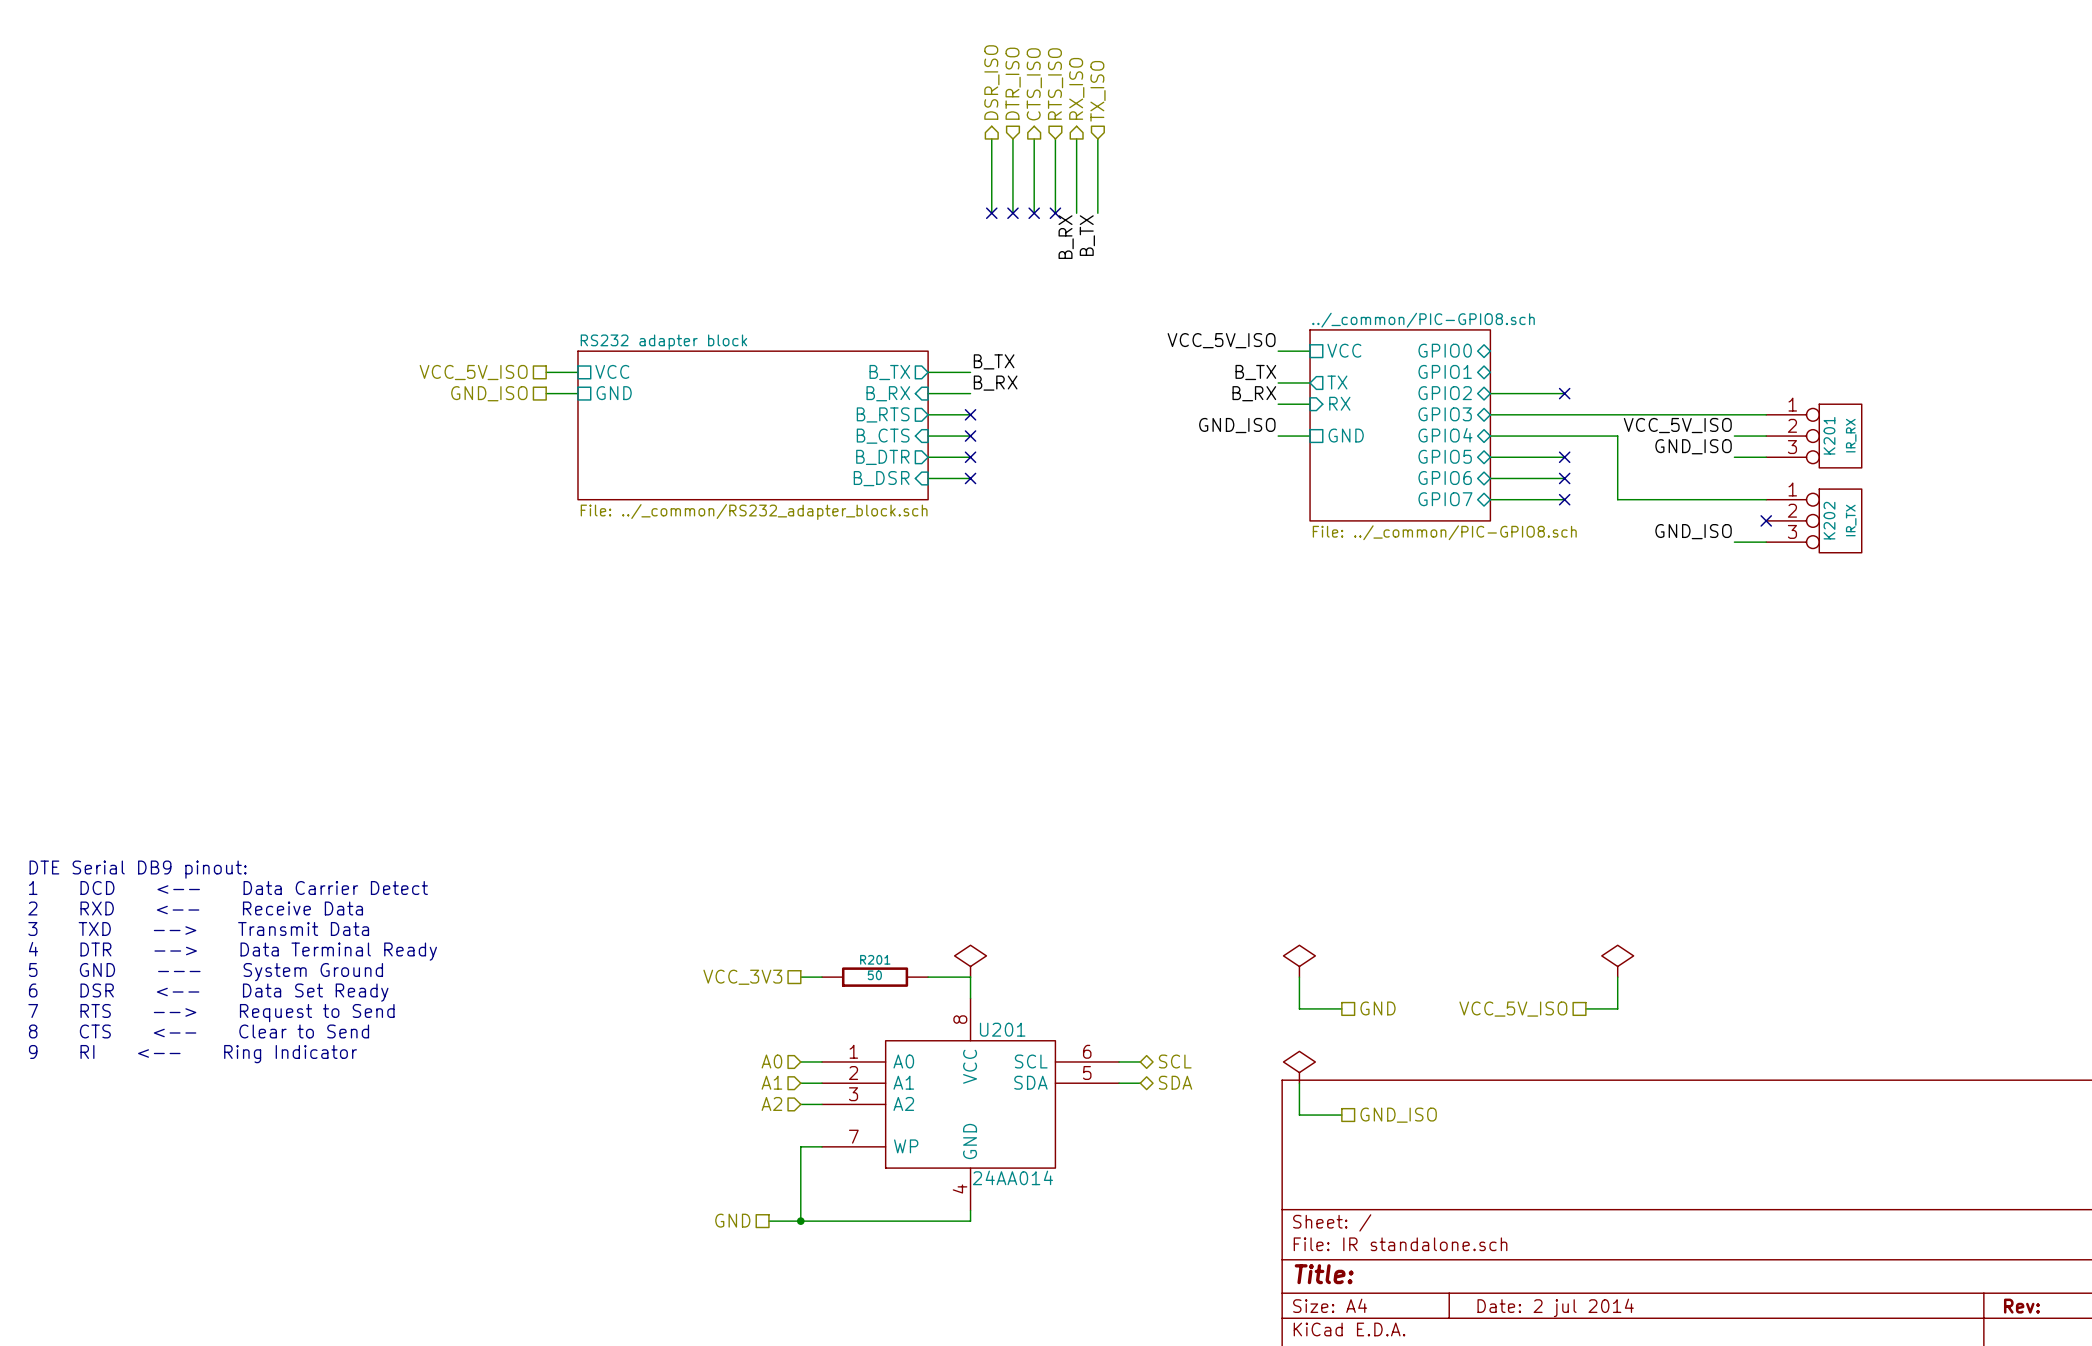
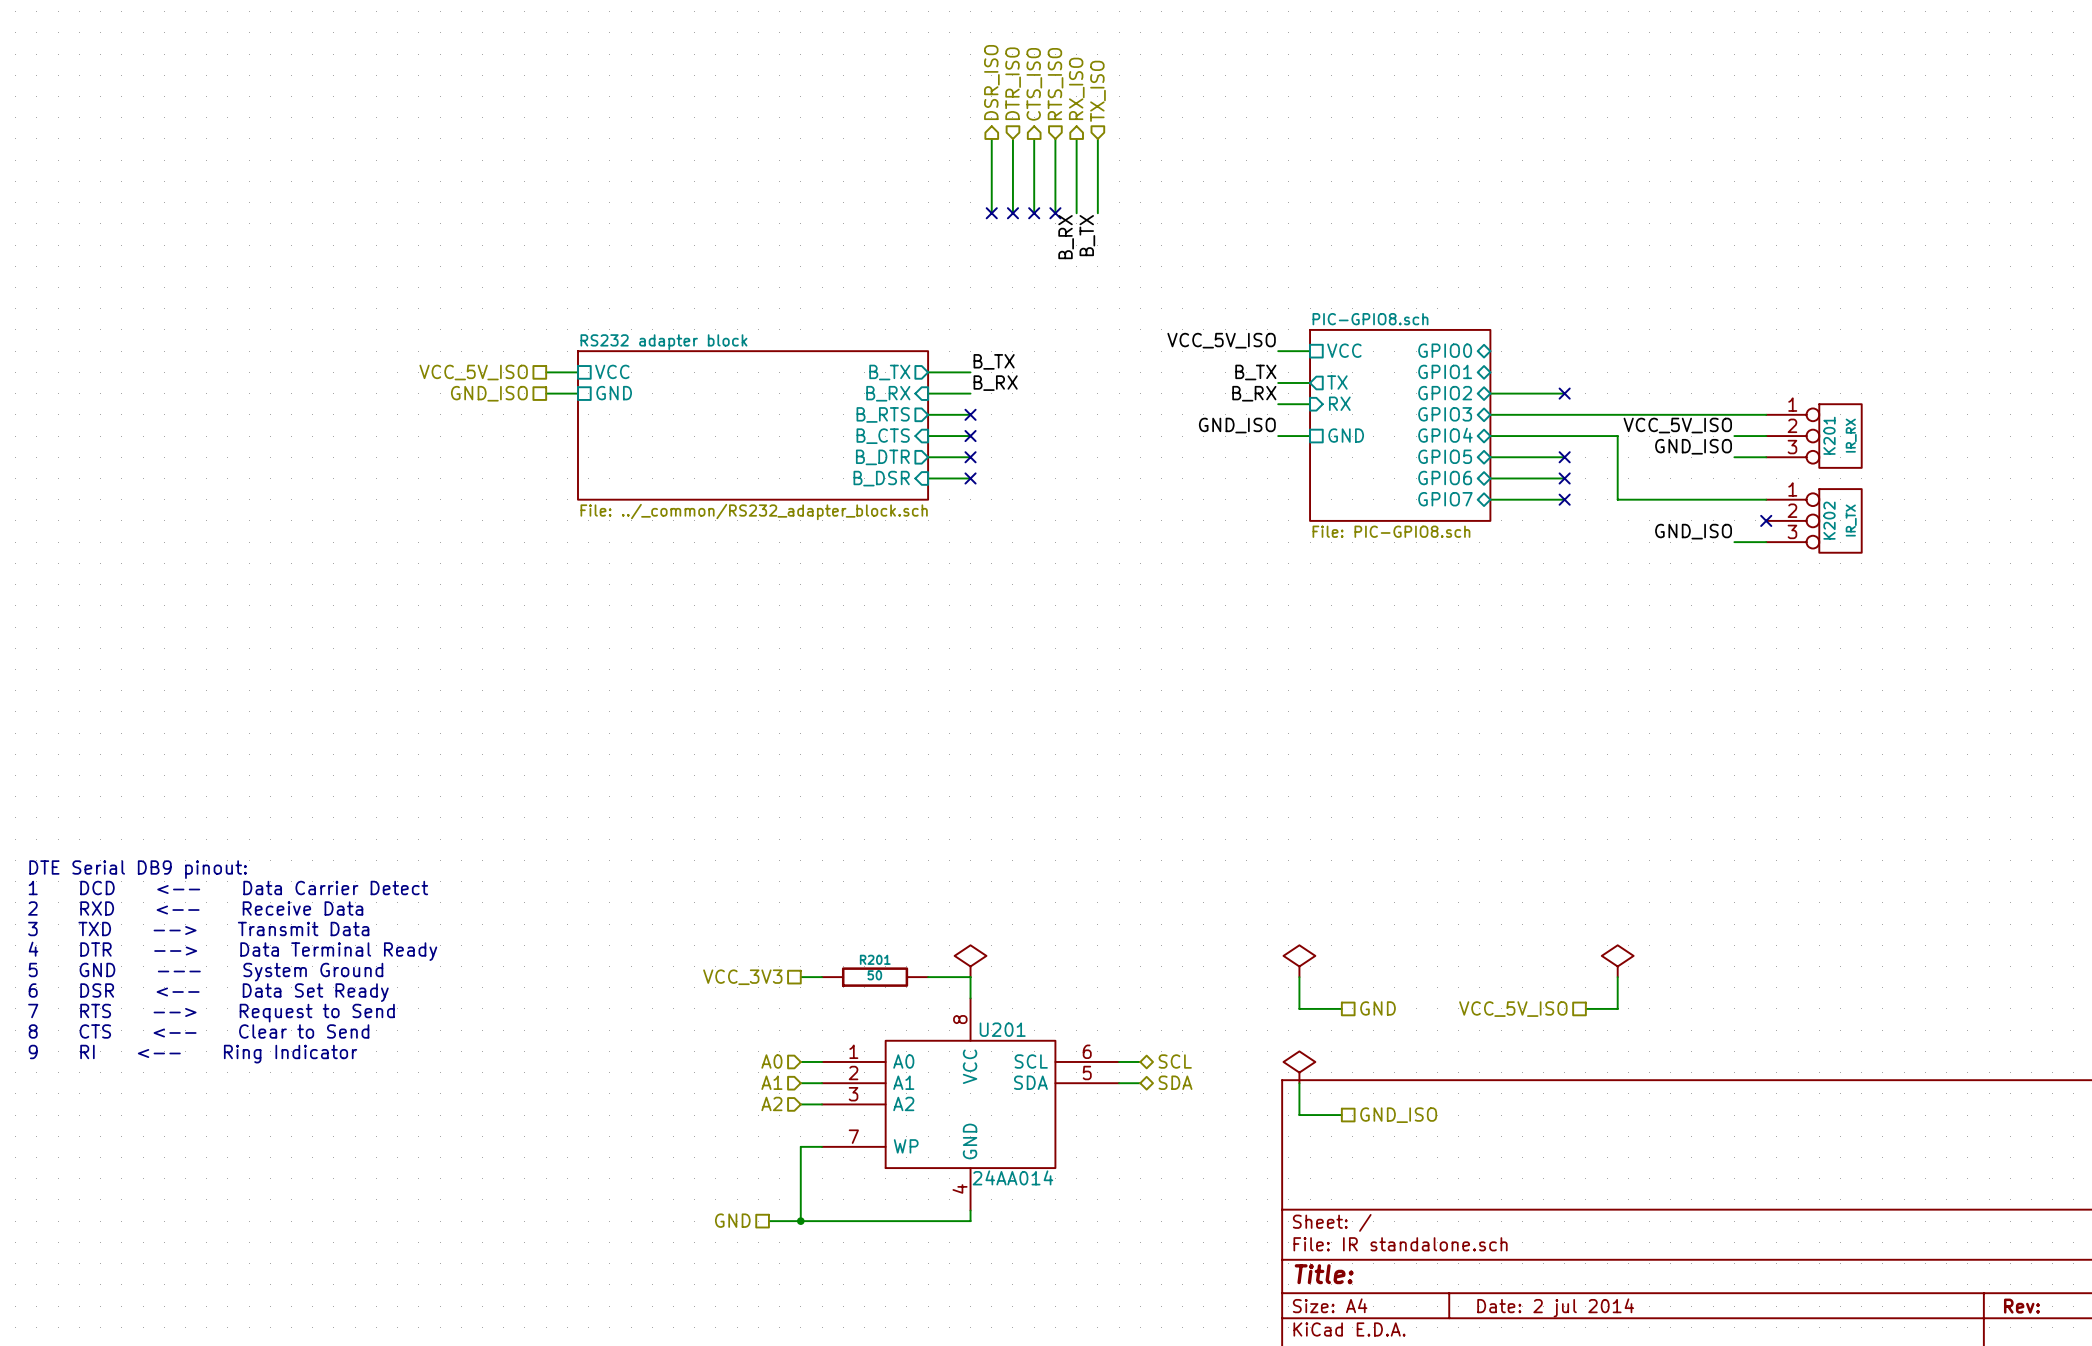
sheet ../_common/PIC-GPIO8.sch name: ../_common/PIC-GPIO8.sch (1423, 320) -> PIC-GPIO8.sch (1370, 319)
sheet ../_common/PIC-GPIO8.sch value: File: ../_common/PIC-GPIO8.sch (1444, 532) -> File: PIC-GPIO8.sch (1391, 531)

